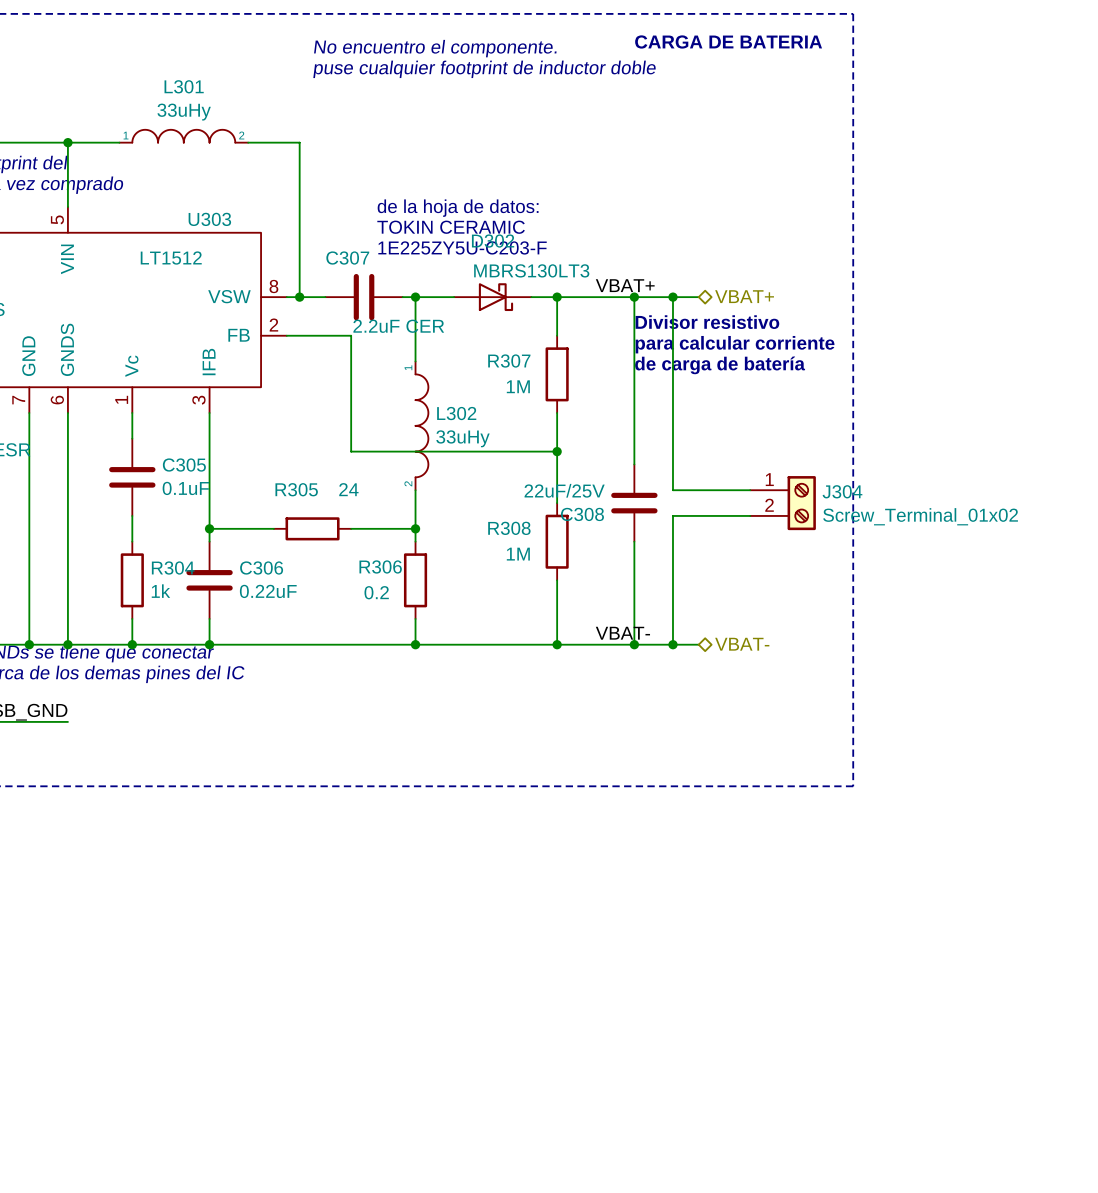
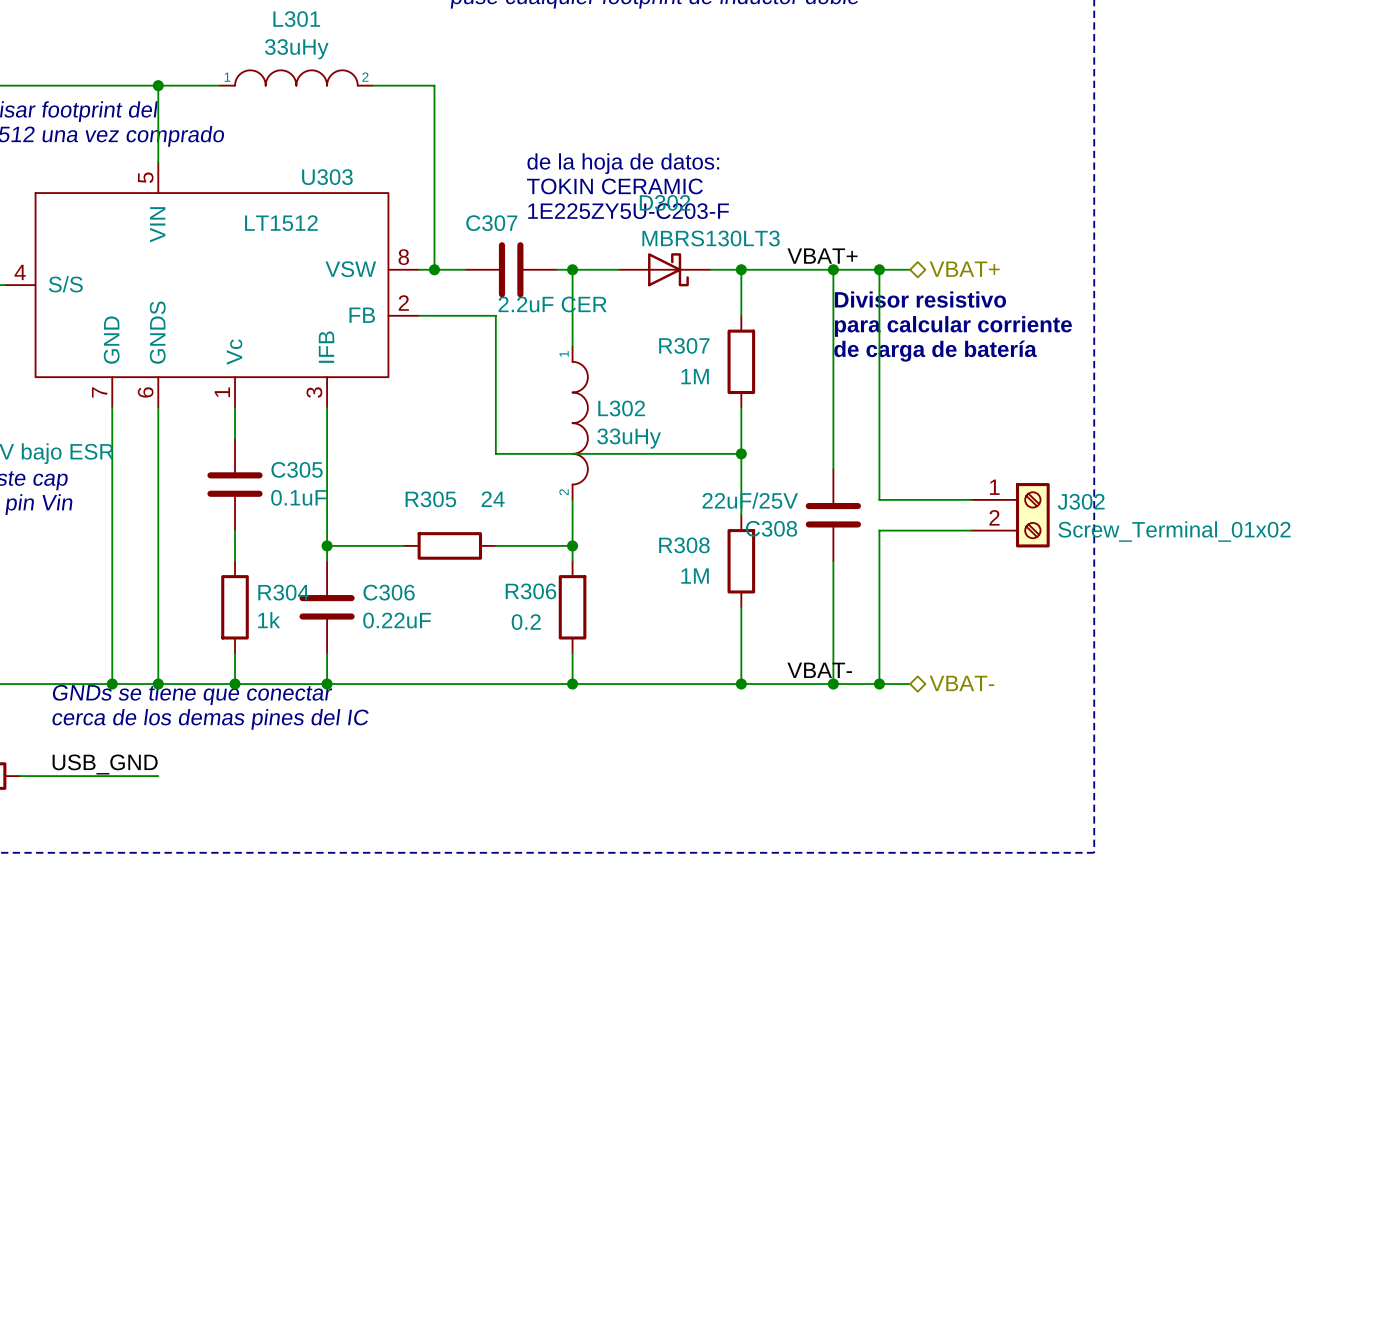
J304 name: J304 (842, 491) -> J302 (1081, 501)

